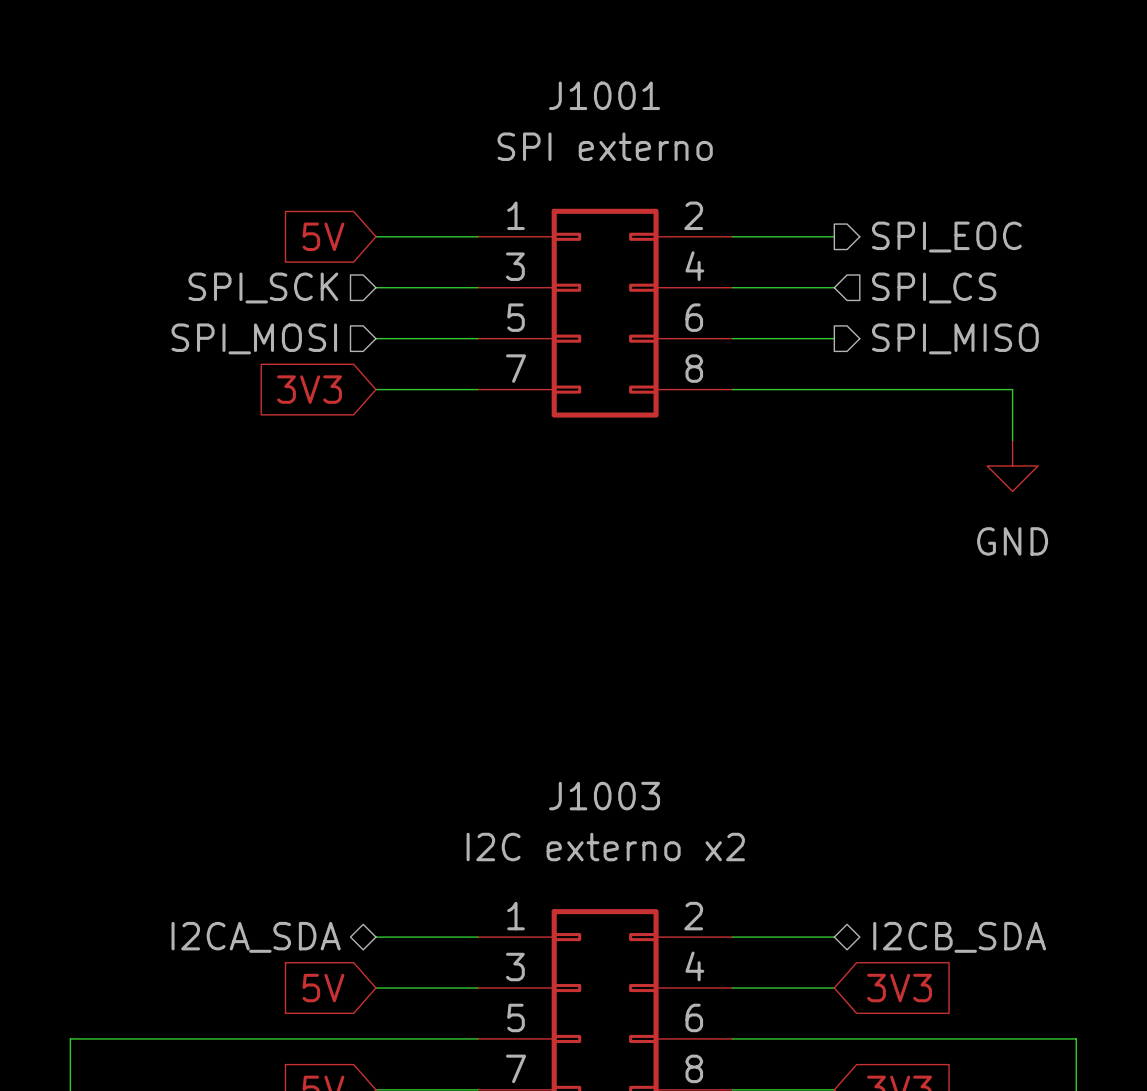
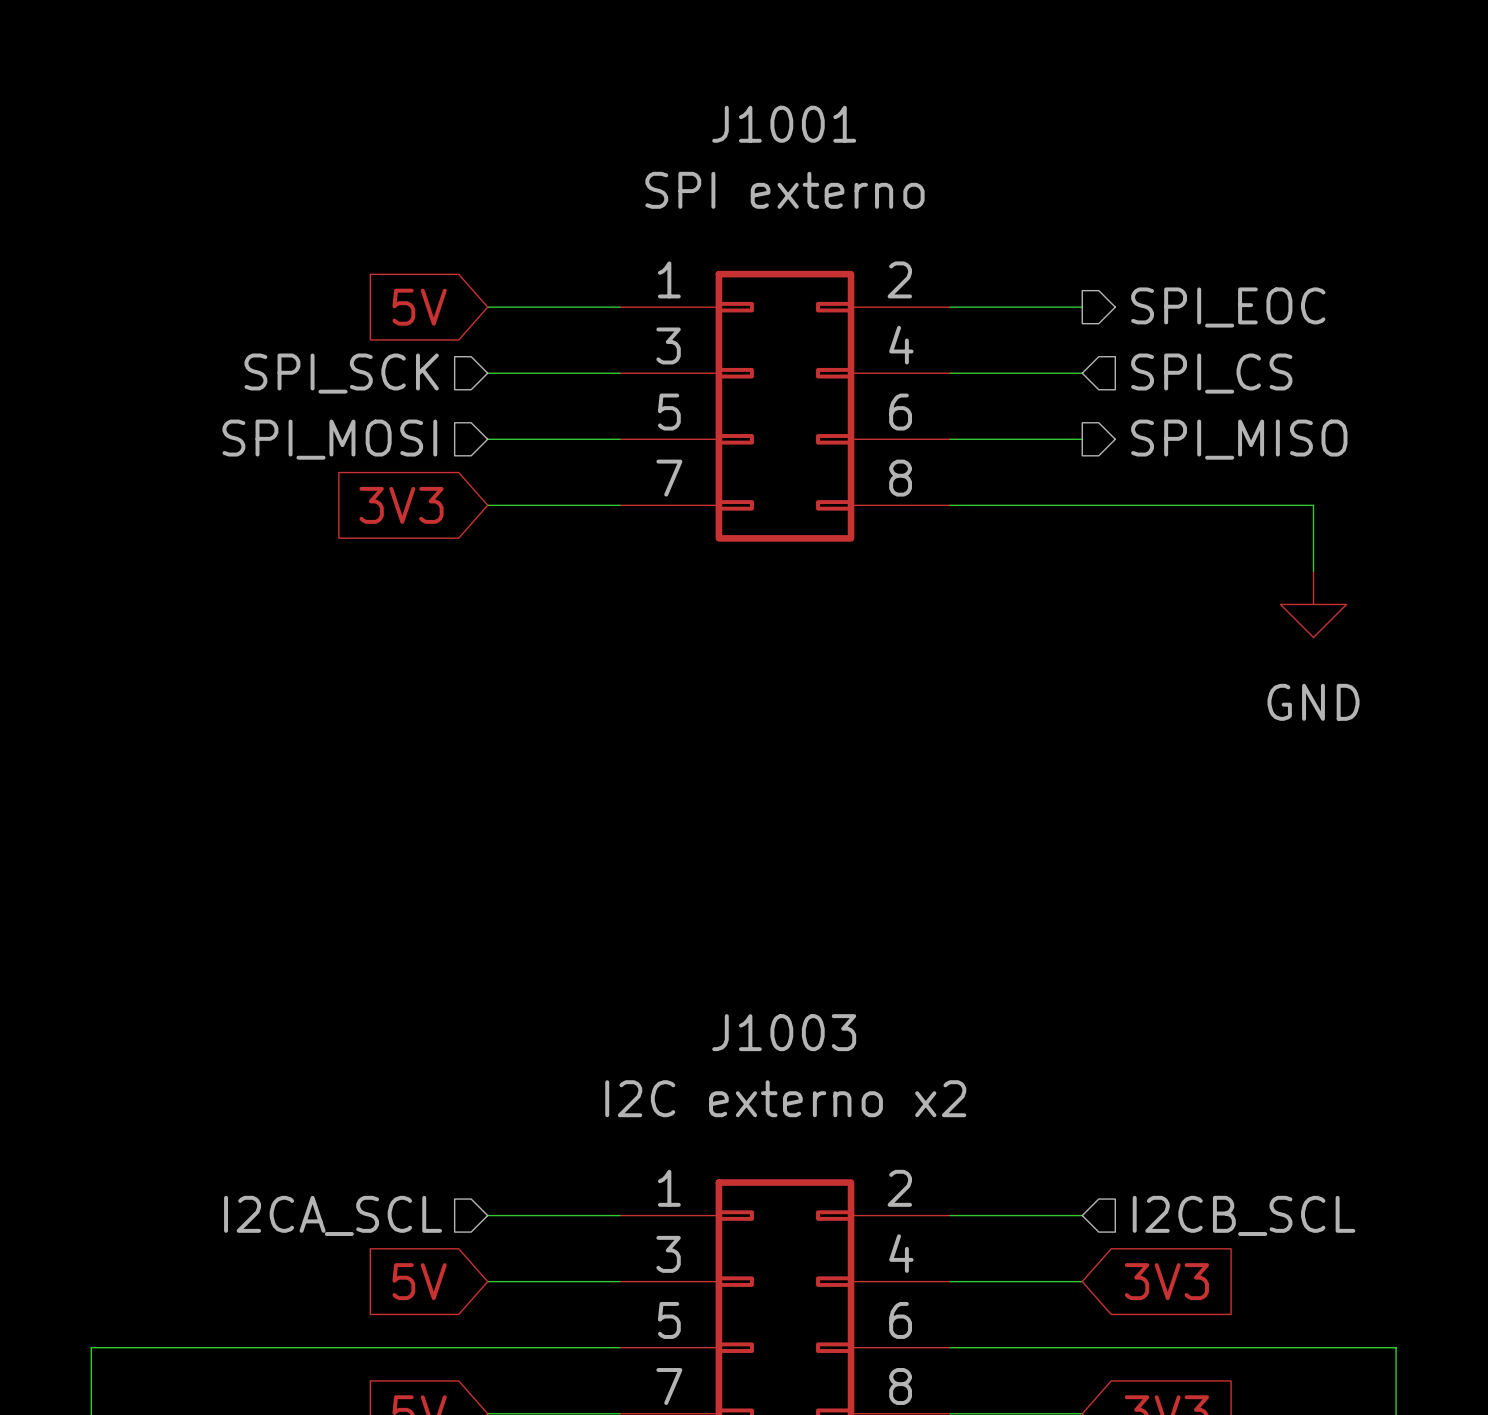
hierarchical label shape: bidirectional (256, 937) -> input (333, 1215)
hierarchical label: I2CA_SDA (256, 937) -> I2CA_SCL (333, 1215)
hierarchical label shape: bidirectional (959, 937) -> input (1244, 1215)
hierarchical label: I2CB_SDA (959, 937) -> I2CB_SCL (1244, 1215)

